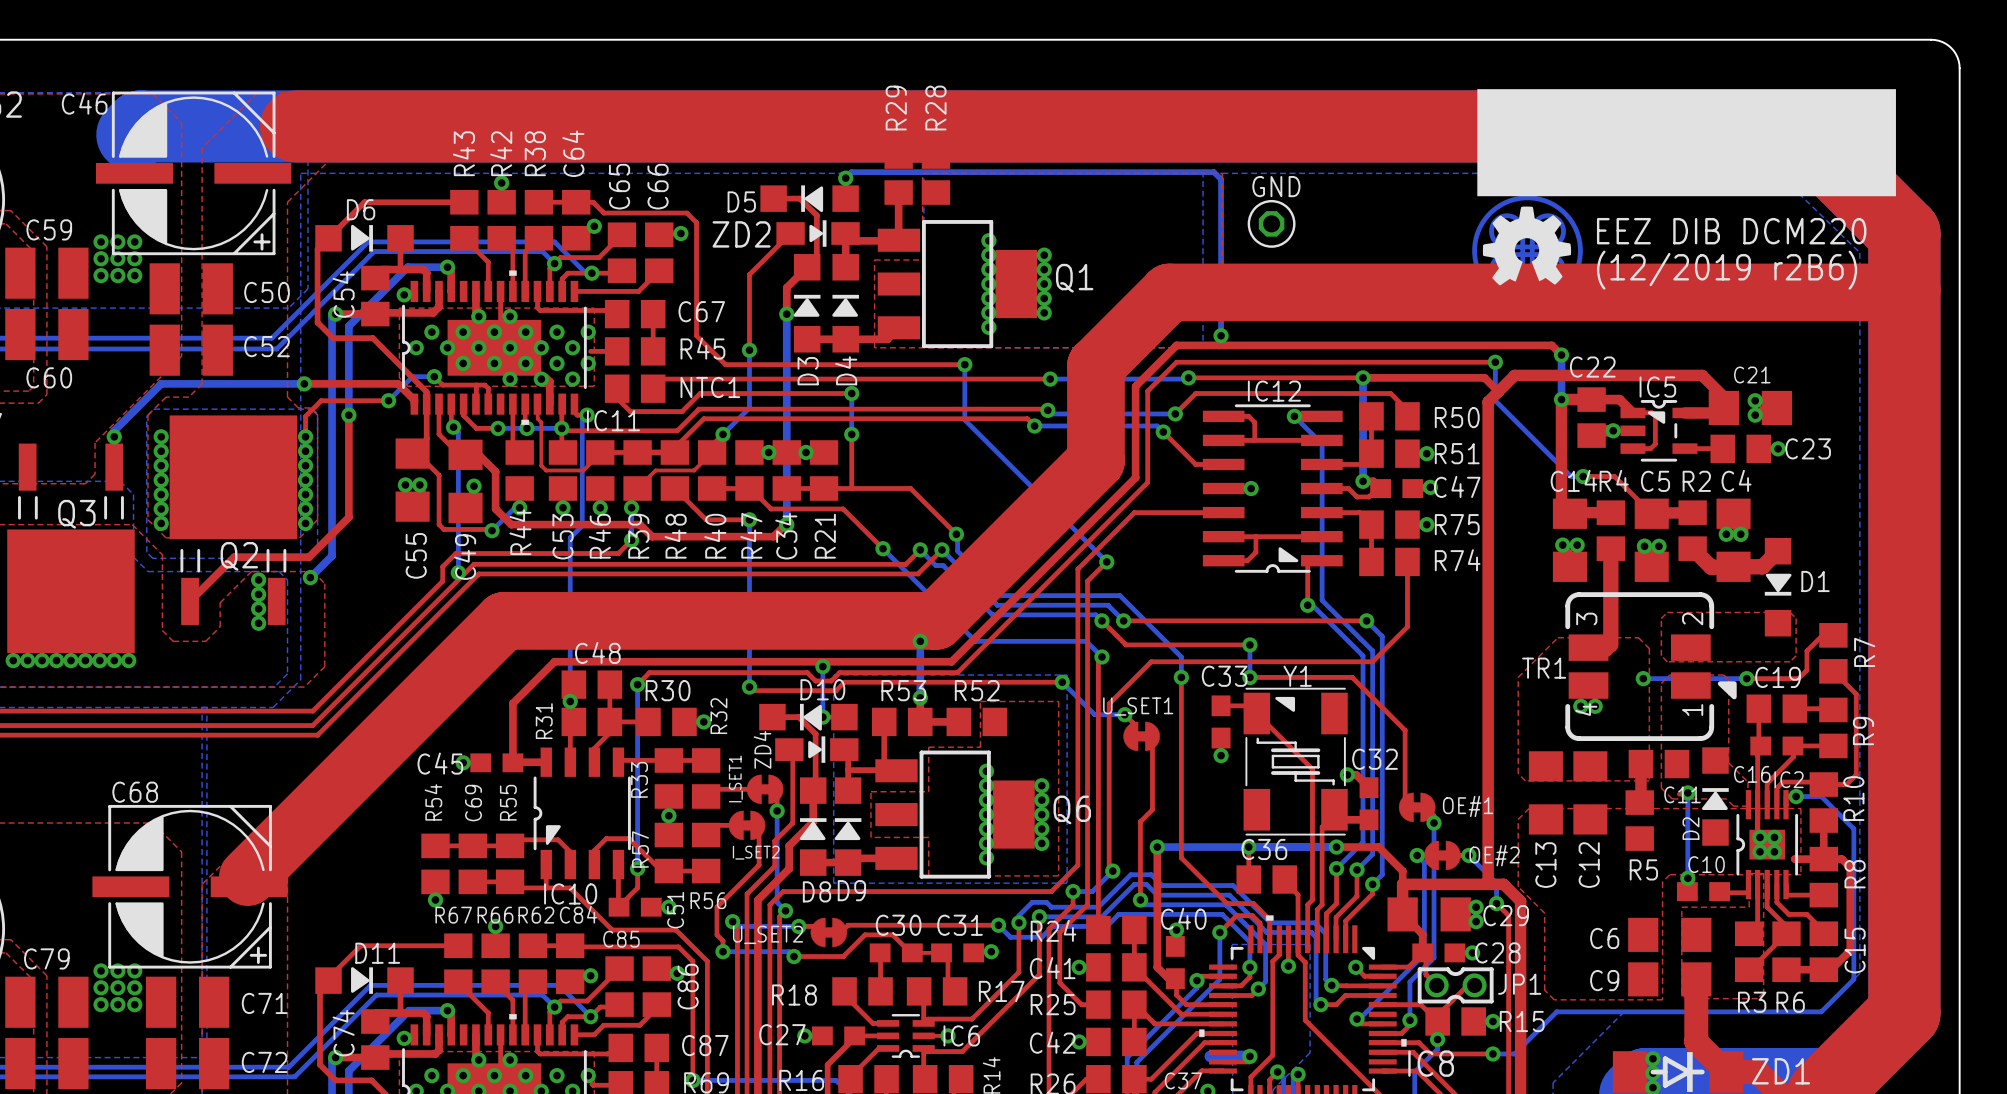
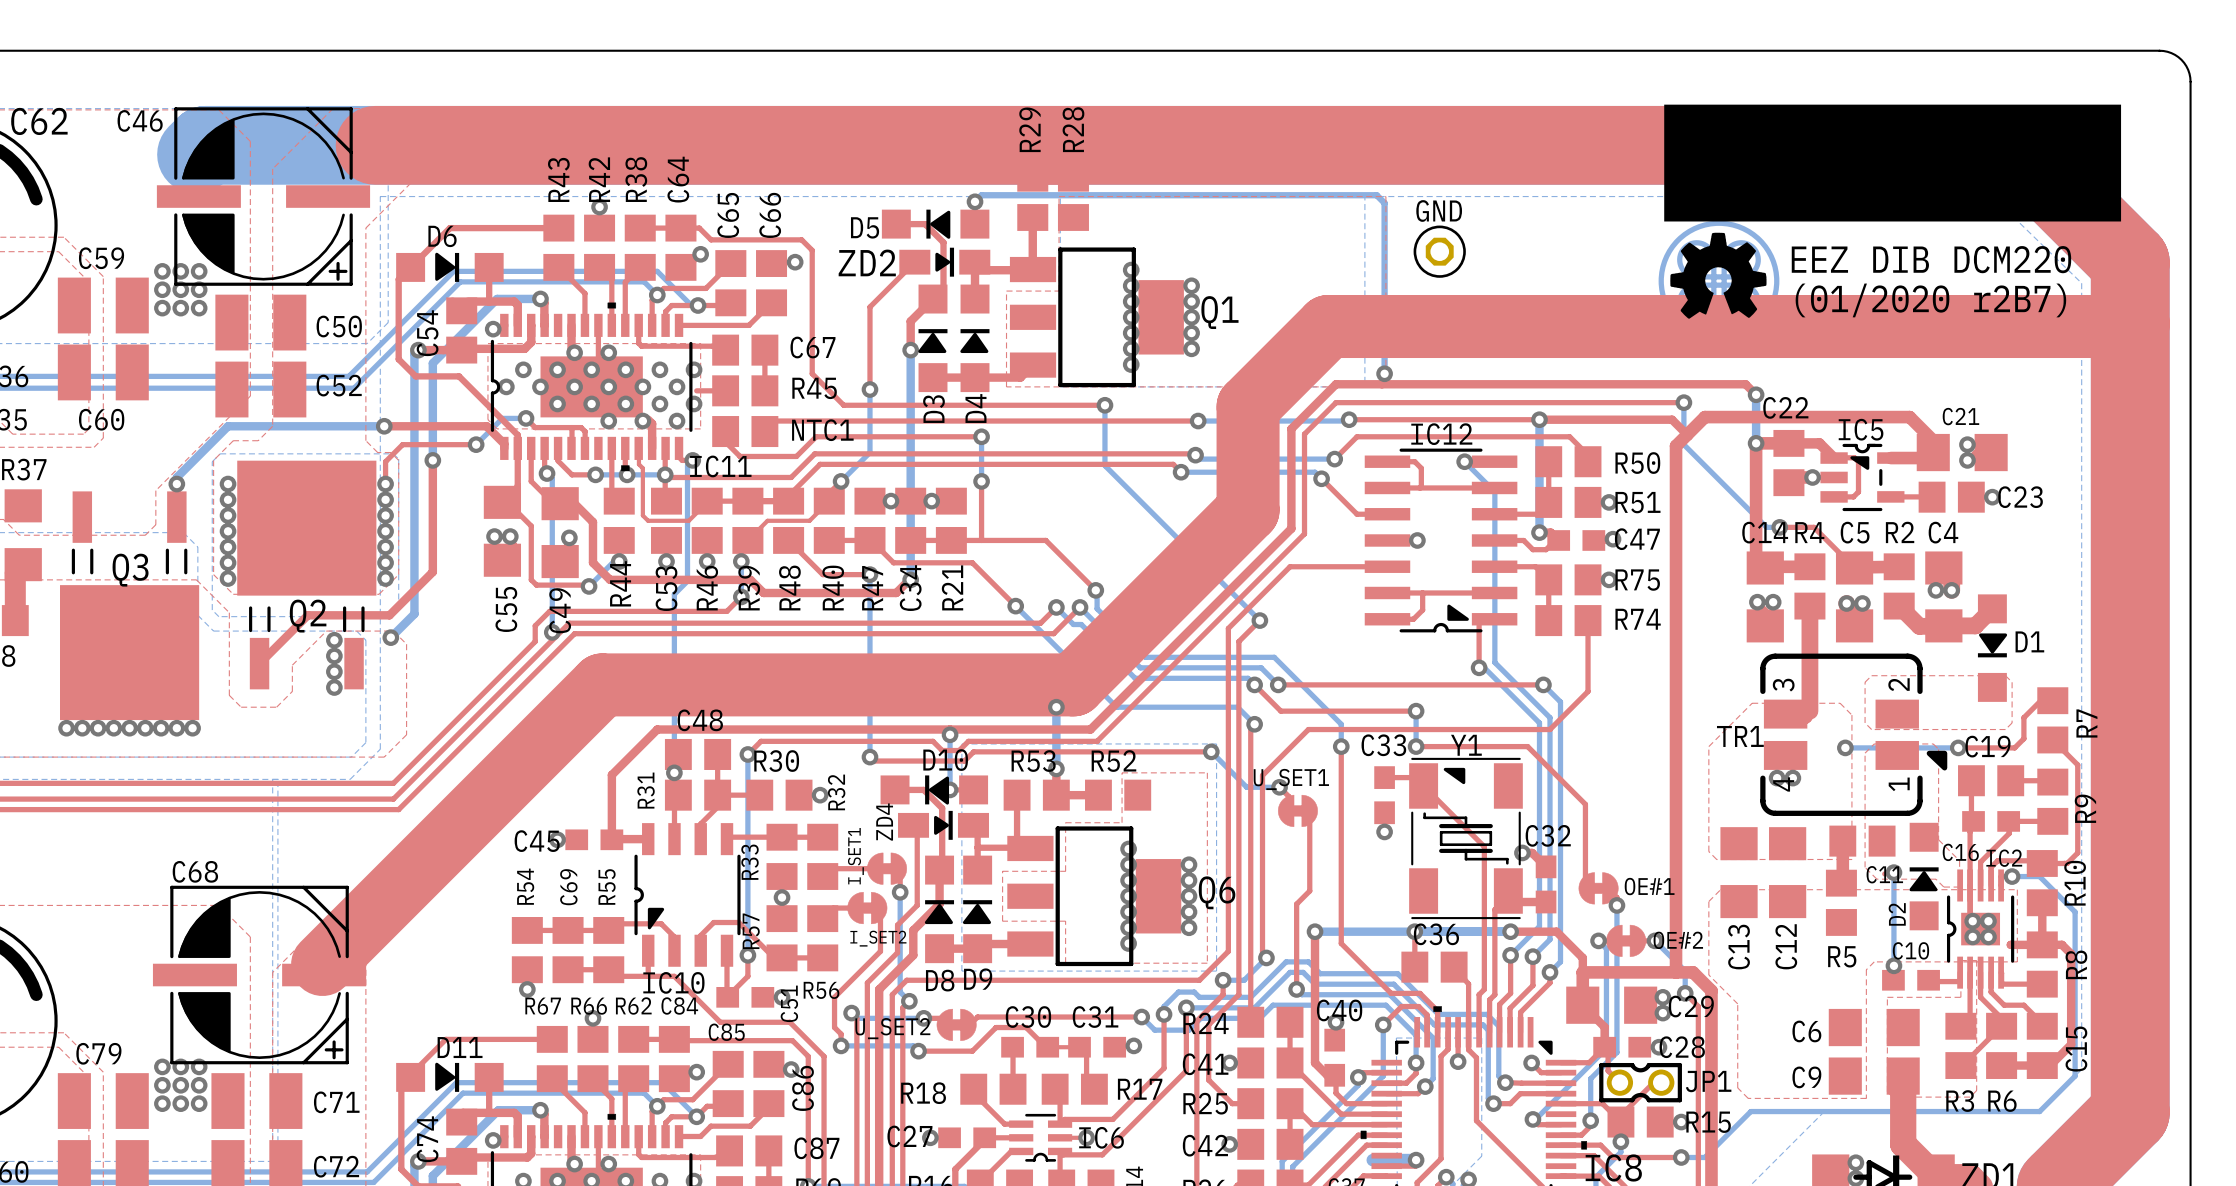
text: (12/2019 r2B6) (1727, 270) -> (01/2020 r2B7) (1930, 300)

